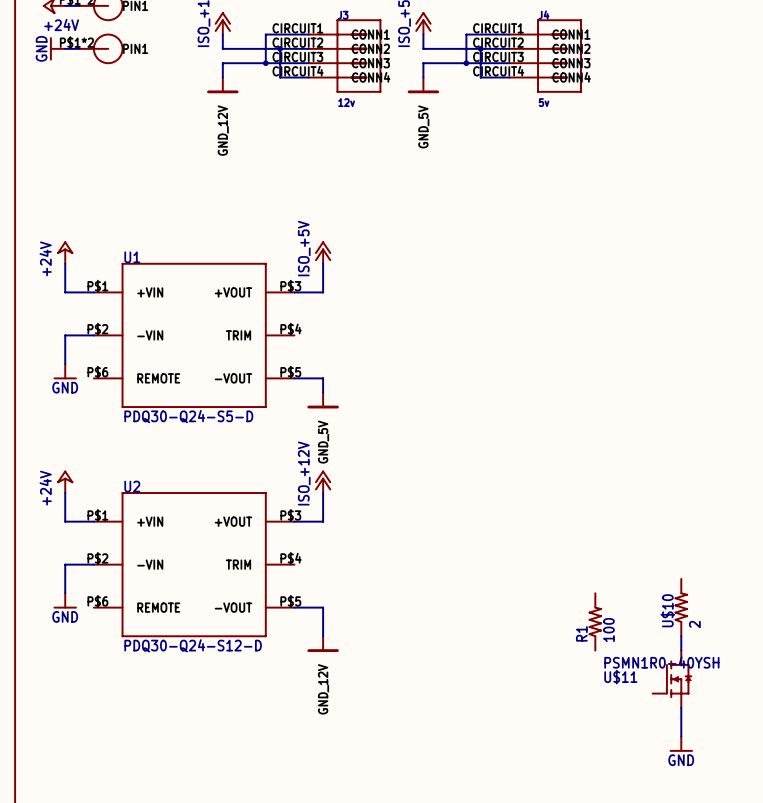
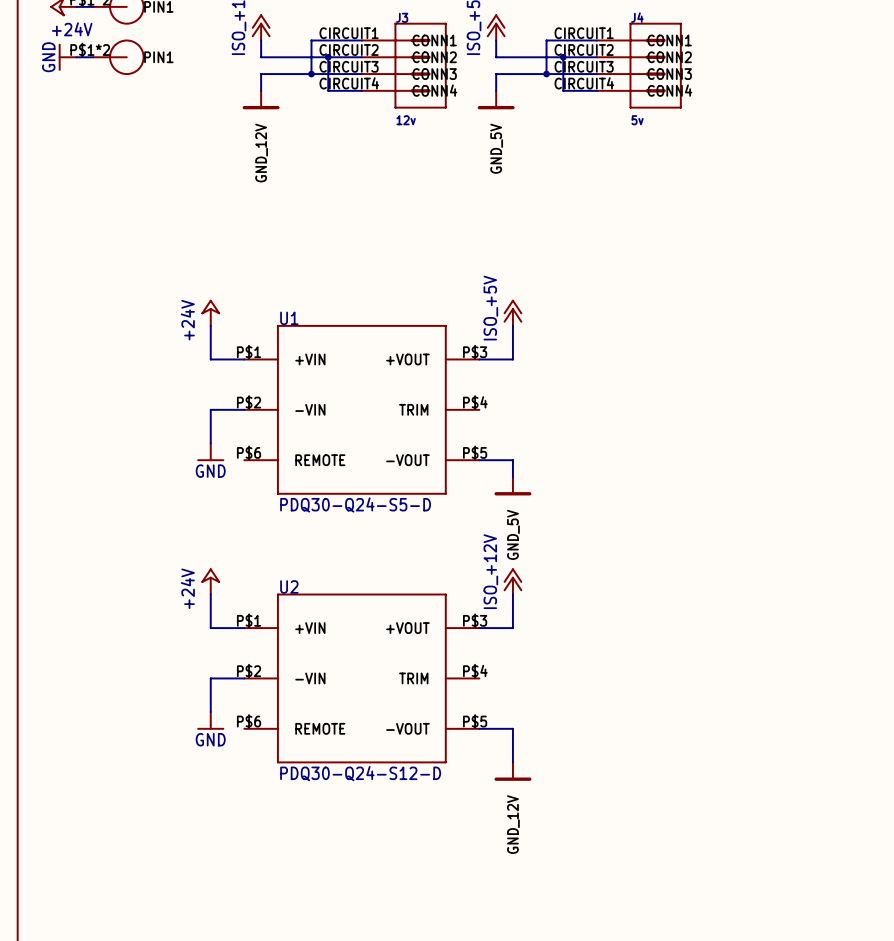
power symbol position: +24V (65, 252) -> +24V (210, 312)
power symbol position: ISO_+5V (323, 252) -> ISO_+5V (512, 312)
wire: (65, 263) (65, 292) (93, 292) -> (210, 325) (210, 359) (244, 359)
wire: (323, 263) (323, 292) (294, 292) -> (512, 325) (512, 359) (479, 359)
wire: (93, 335) (65, 335) (65, 364) -> (244, 409) (210, 409) (210, 443)
U1 position: (194, 335) -> (361, 409)
power symbol position: GND (65, 371) -> GND (210, 452)
wire: (294, 378) (323, 378) (323, 392) -> (479, 460) (512, 460) (512, 476)
power symbol position: (323, 400) -> (512, 486)
power symbol position: +24V (65, 481) -> +24V (210, 581)
power symbol position: ISO_+12V (323, 481) -> ISO_+12V (512, 581)
wire: (65, 493) (65, 521) (93, 521) -> (210, 594) (210, 628) (244, 628)
wire: (323, 493) (323, 521) (294, 521) -> (512, 594) (512, 628) (479, 628)
wire: (93, 564) (65, 564) (65, 593) -> (244, 678) (210, 678) (210, 712)
U2 position: (194, 564) -> (361, 678)
power symbol position: GND (65, 600) -> GND (210, 720)
wire: (294, 607) (323, 607) (323, 636) -> (479, 728) (512, 728) (512, 762)
U$10: 2 (681, 607) -> none
R1: 100 (595, 621) -> none
wire: (681, 636) (681, 650) -> none
power symbol position: (323, 644) -> (512, 771)
U$11: PSMN1R0-40YSH (672, 679) -> none
wire: (681, 707) (681, 736) -> none
power symbol: GND (681, 744) -> none

